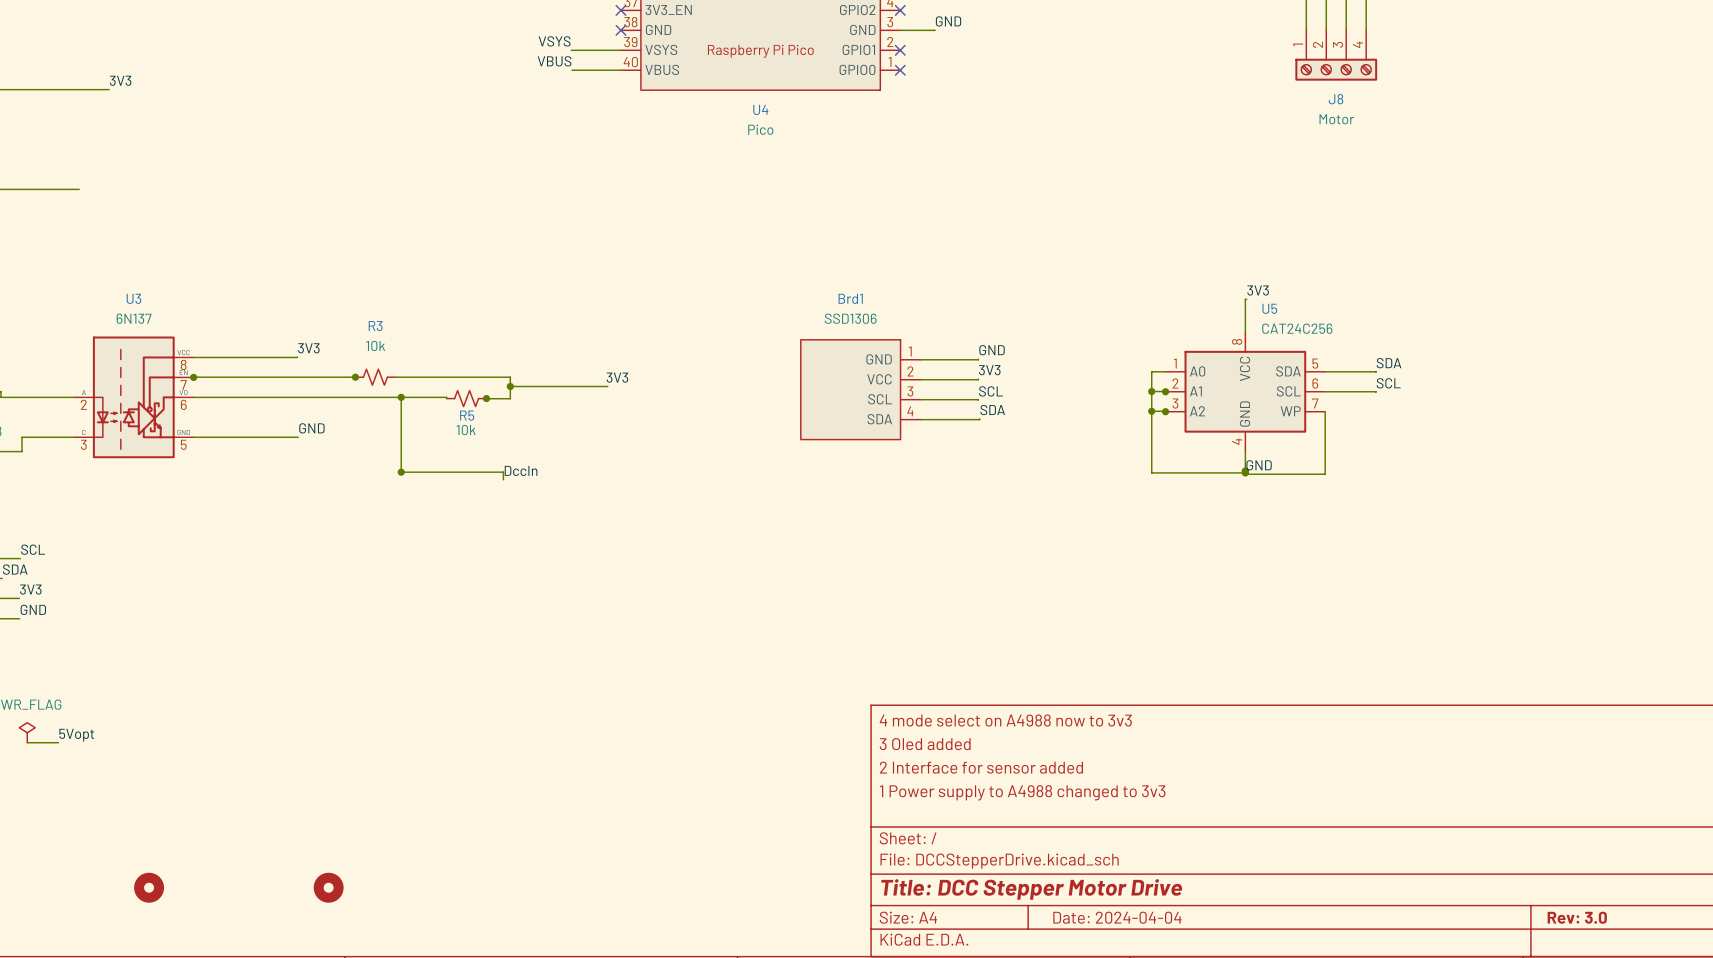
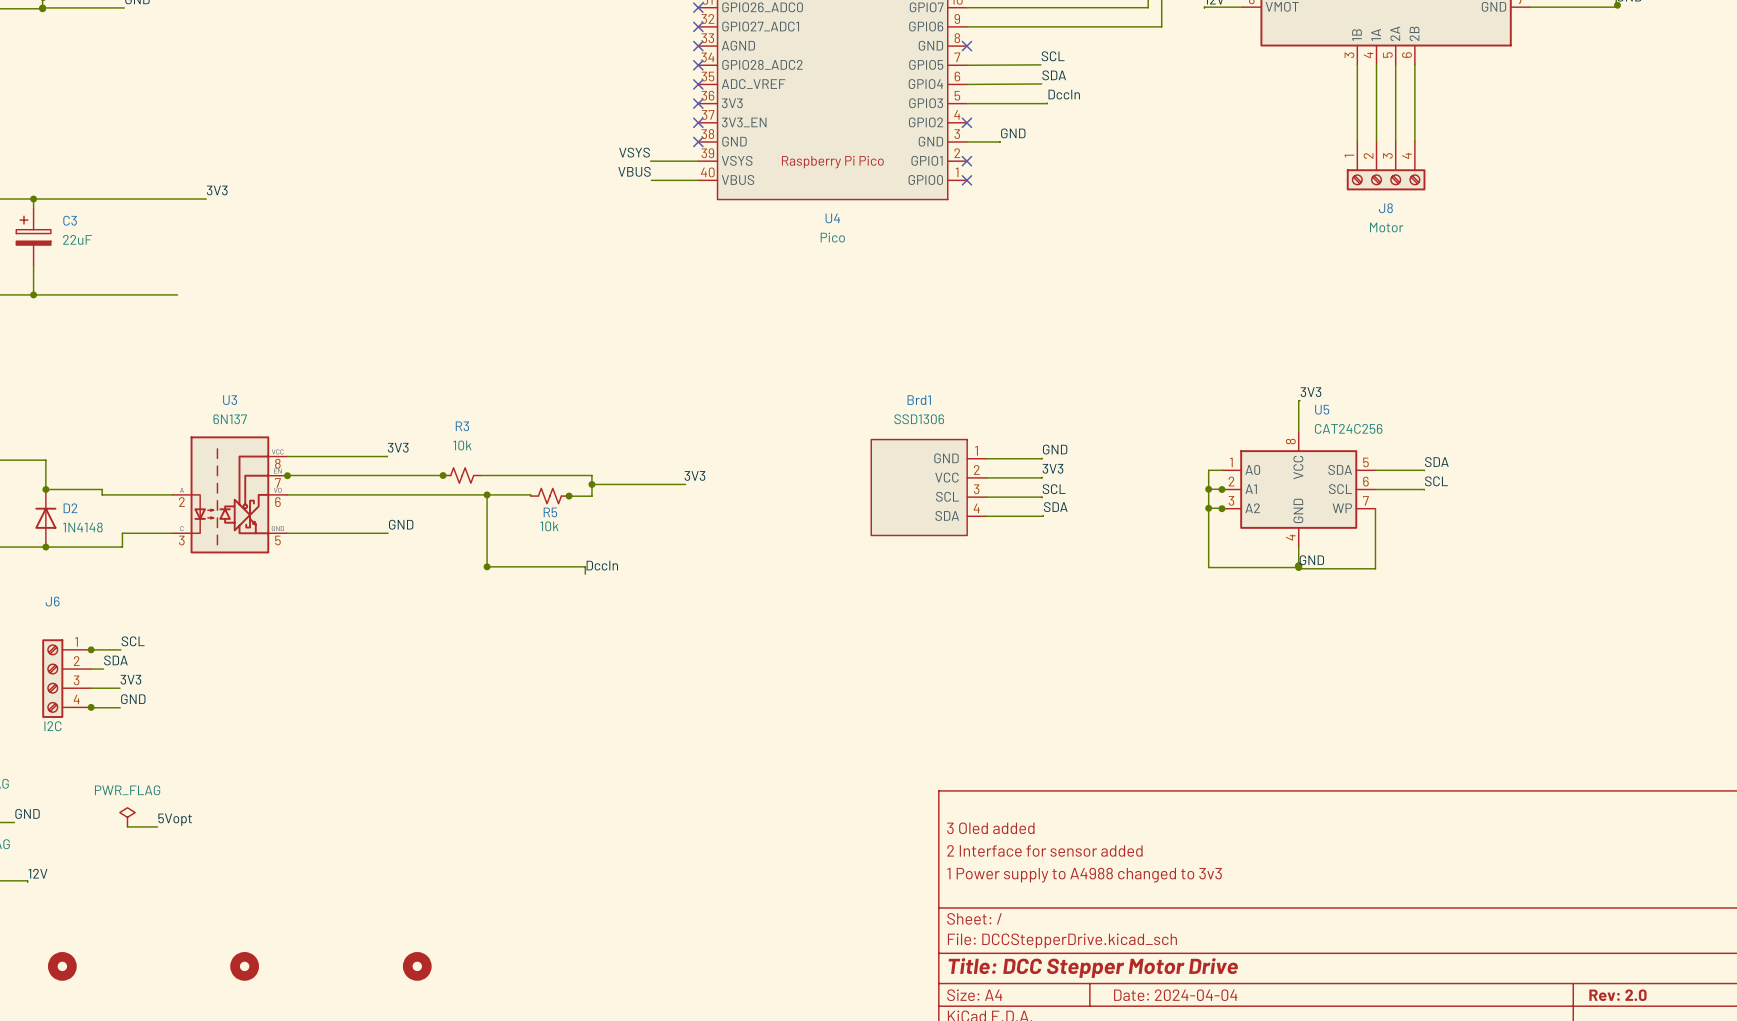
title block: 4 mode select on A4988 now to 3v3 (1005, 720) -> none
title block: Rev: 3.0 (1577, 917) -> Rev: 2.0 (1617, 995)

